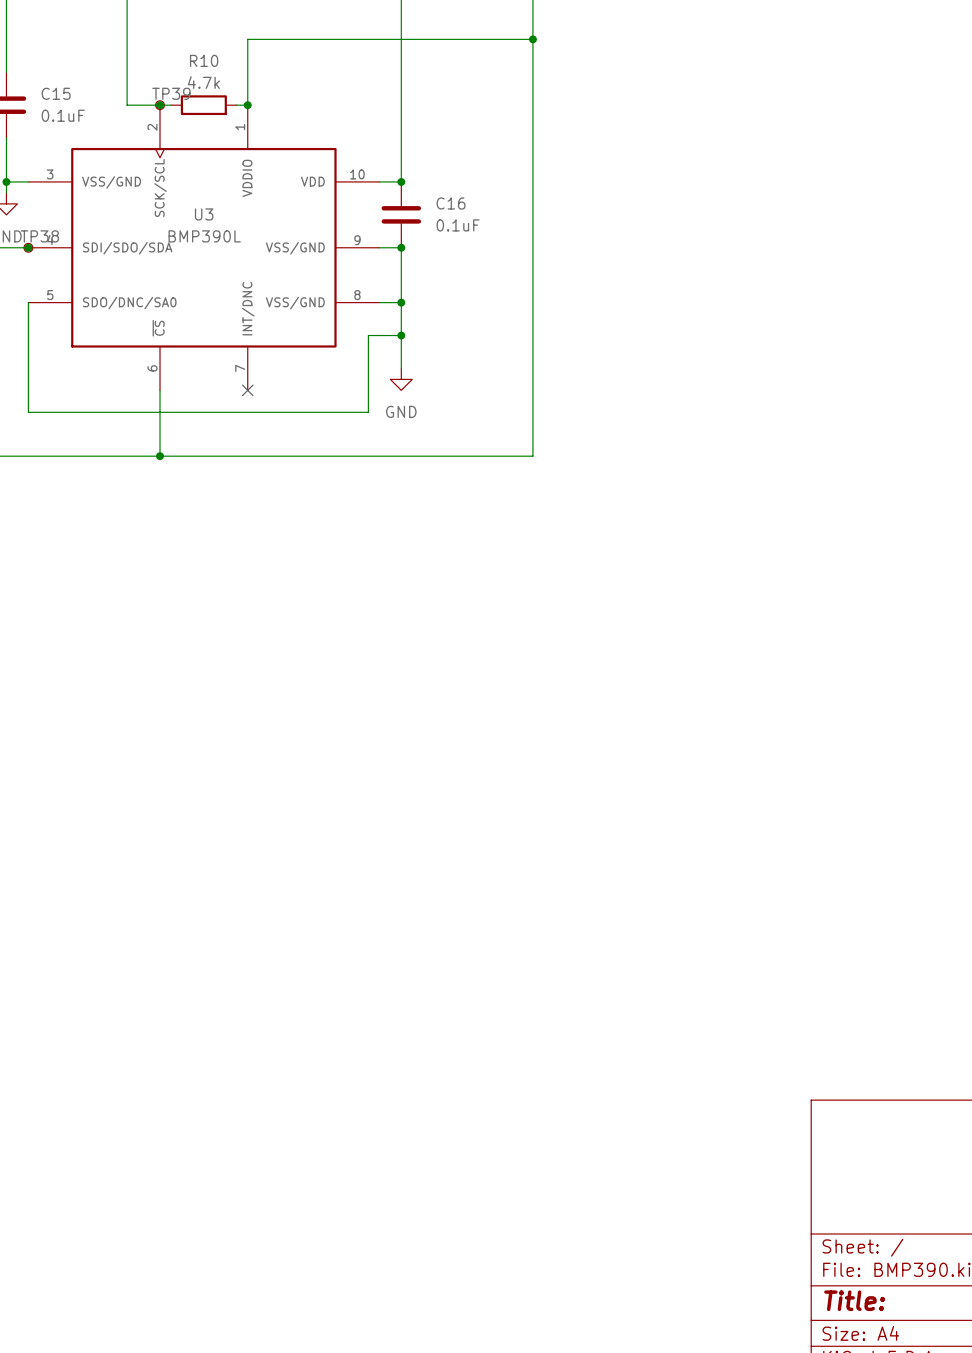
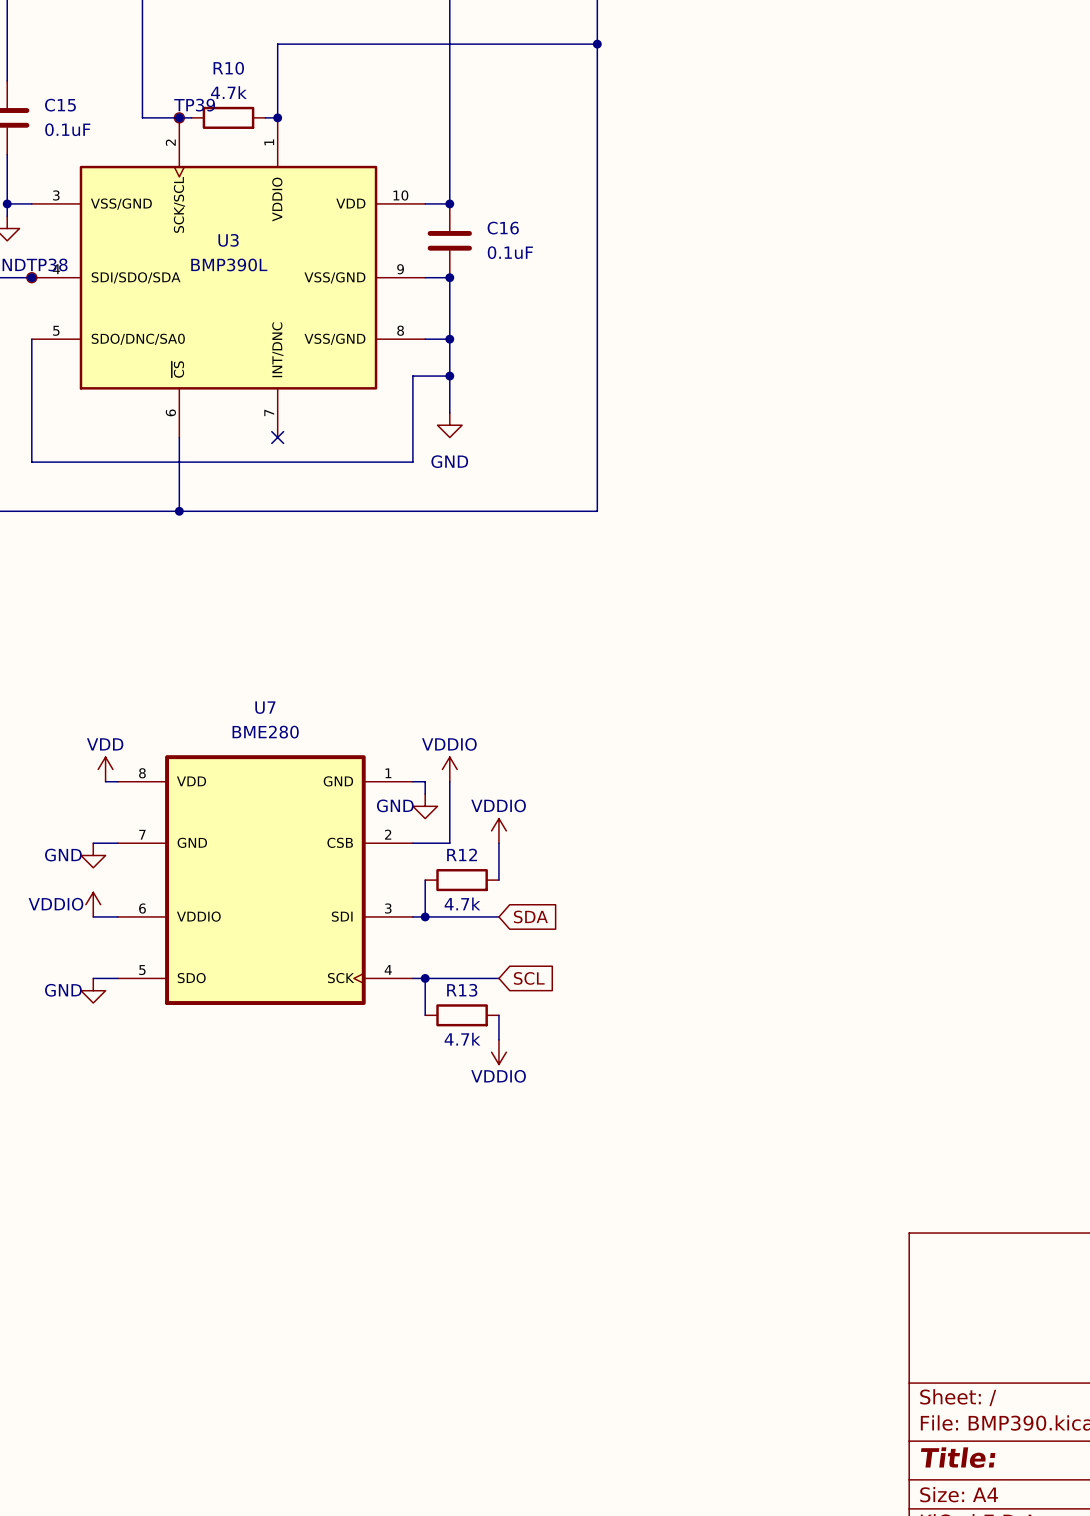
power symbol: none -> VDD (105, 769)
power symbol: none -> VDDIO (449, 769)
wire: none -> (105, 781) (117, 781)
wire: none -> (412, 781) (425, 781) (425, 794)
wire: none -> (449, 781) (449, 843) (412, 843)
power symbol: none -> GND (425, 806)
power symbol: none -> VDDIO (498, 830)
wire: none -> (93, 843) (117, 843)
wire: none -> (498, 843) (498, 880)
power symbol: none -> GND (93, 855)
U7: none -> BME280 (265, 880)
wire: none -> (425, 880) (425, 916)
R12: none -> 4.7k (462, 880)
power symbol: none -> VDDIO (93, 904)
wire: none -> (93, 916) (117, 916)
wire: none -> (412, 916) (498, 916)
junction: none -> (425, 916)
global label: none -> SDA (530, 916)
wire: none -> (93, 978) (117, 978)
wire: none -> (412, 978) (498, 978)
wire: none -> (425, 978) (425, 1015)
junction: none -> (425, 978)
global label: none -> SCL (529, 978)
power symbol: none -> GND (93, 990)
R13: none -> 4.7k (462, 1015)
wire: none -> (498, 1015) (498, 1039)
power symbol: none -> VDDIO (498, 1052)

